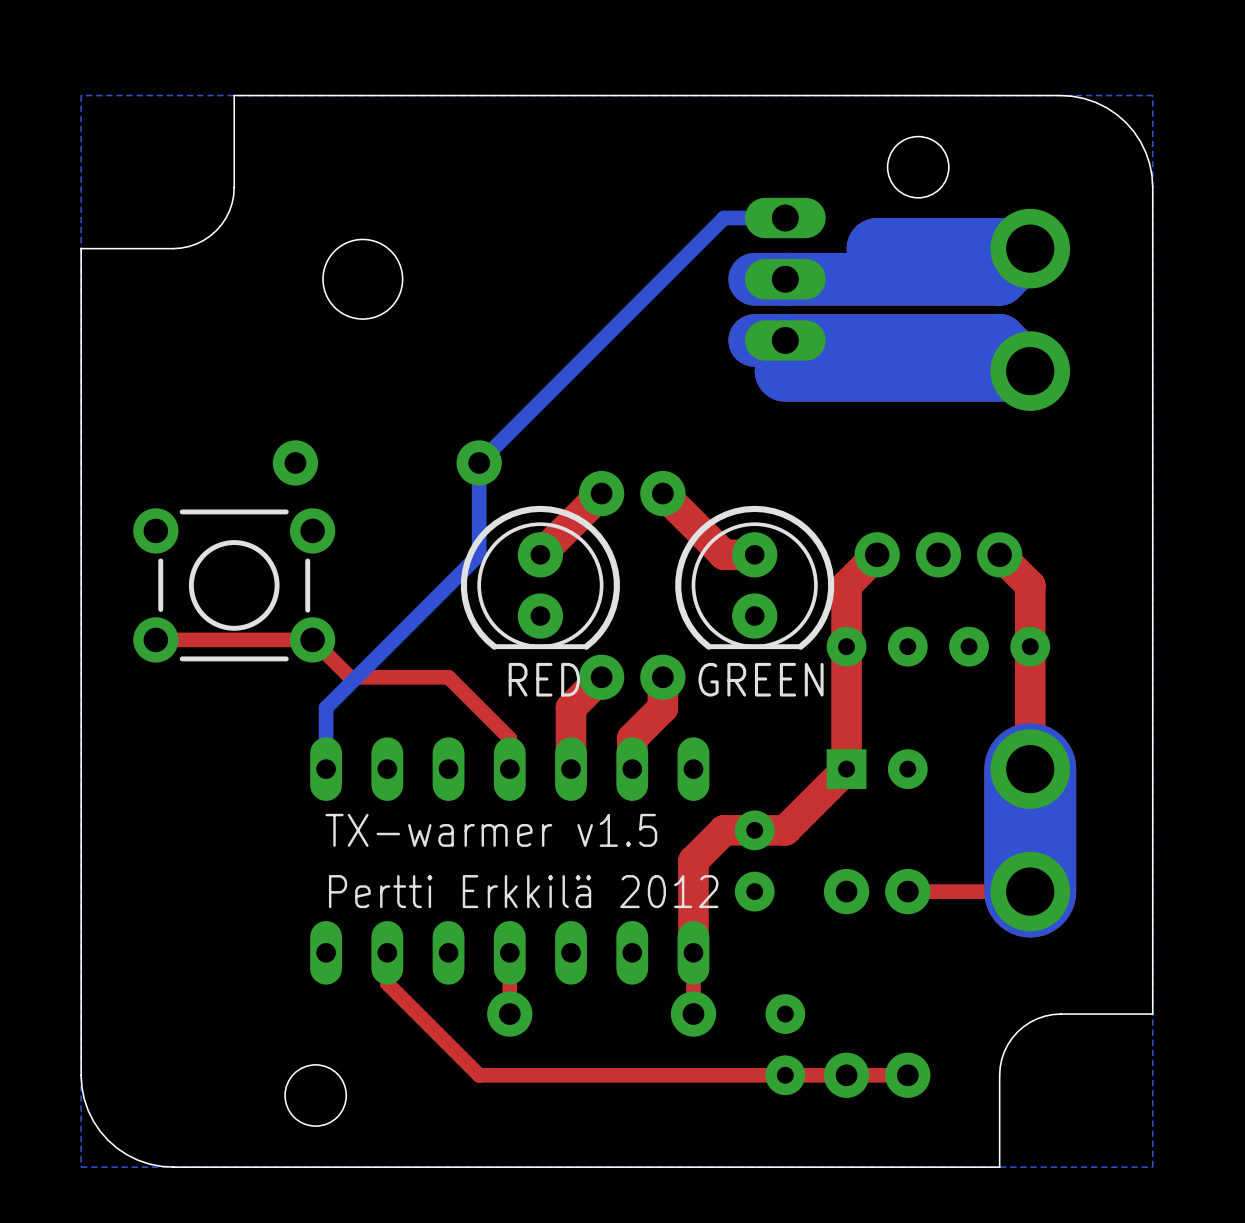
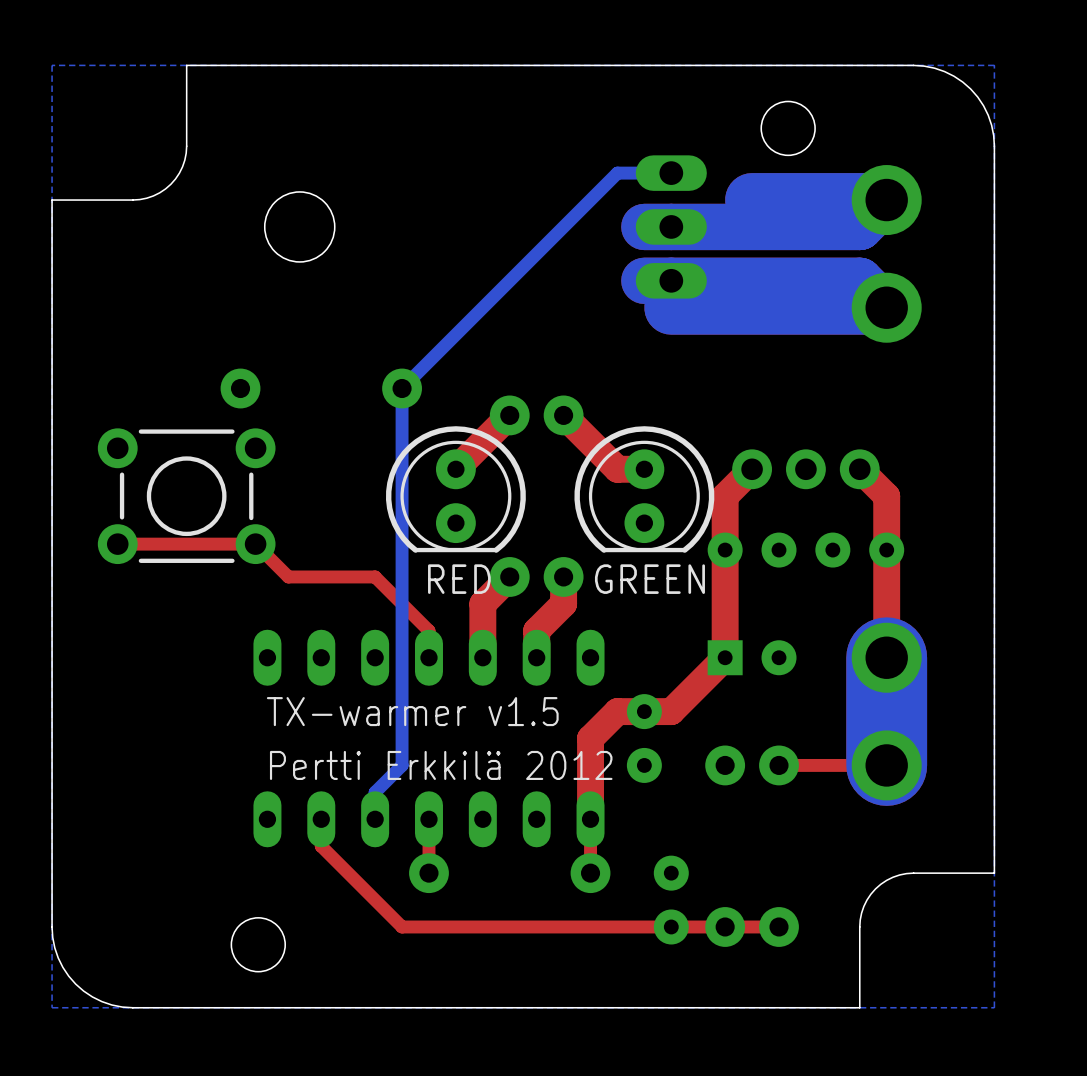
bottom track: (479, 554) (326, 707) (326, 769) -> (402, 469) (402, 765) (375, 792) (375, 819)

